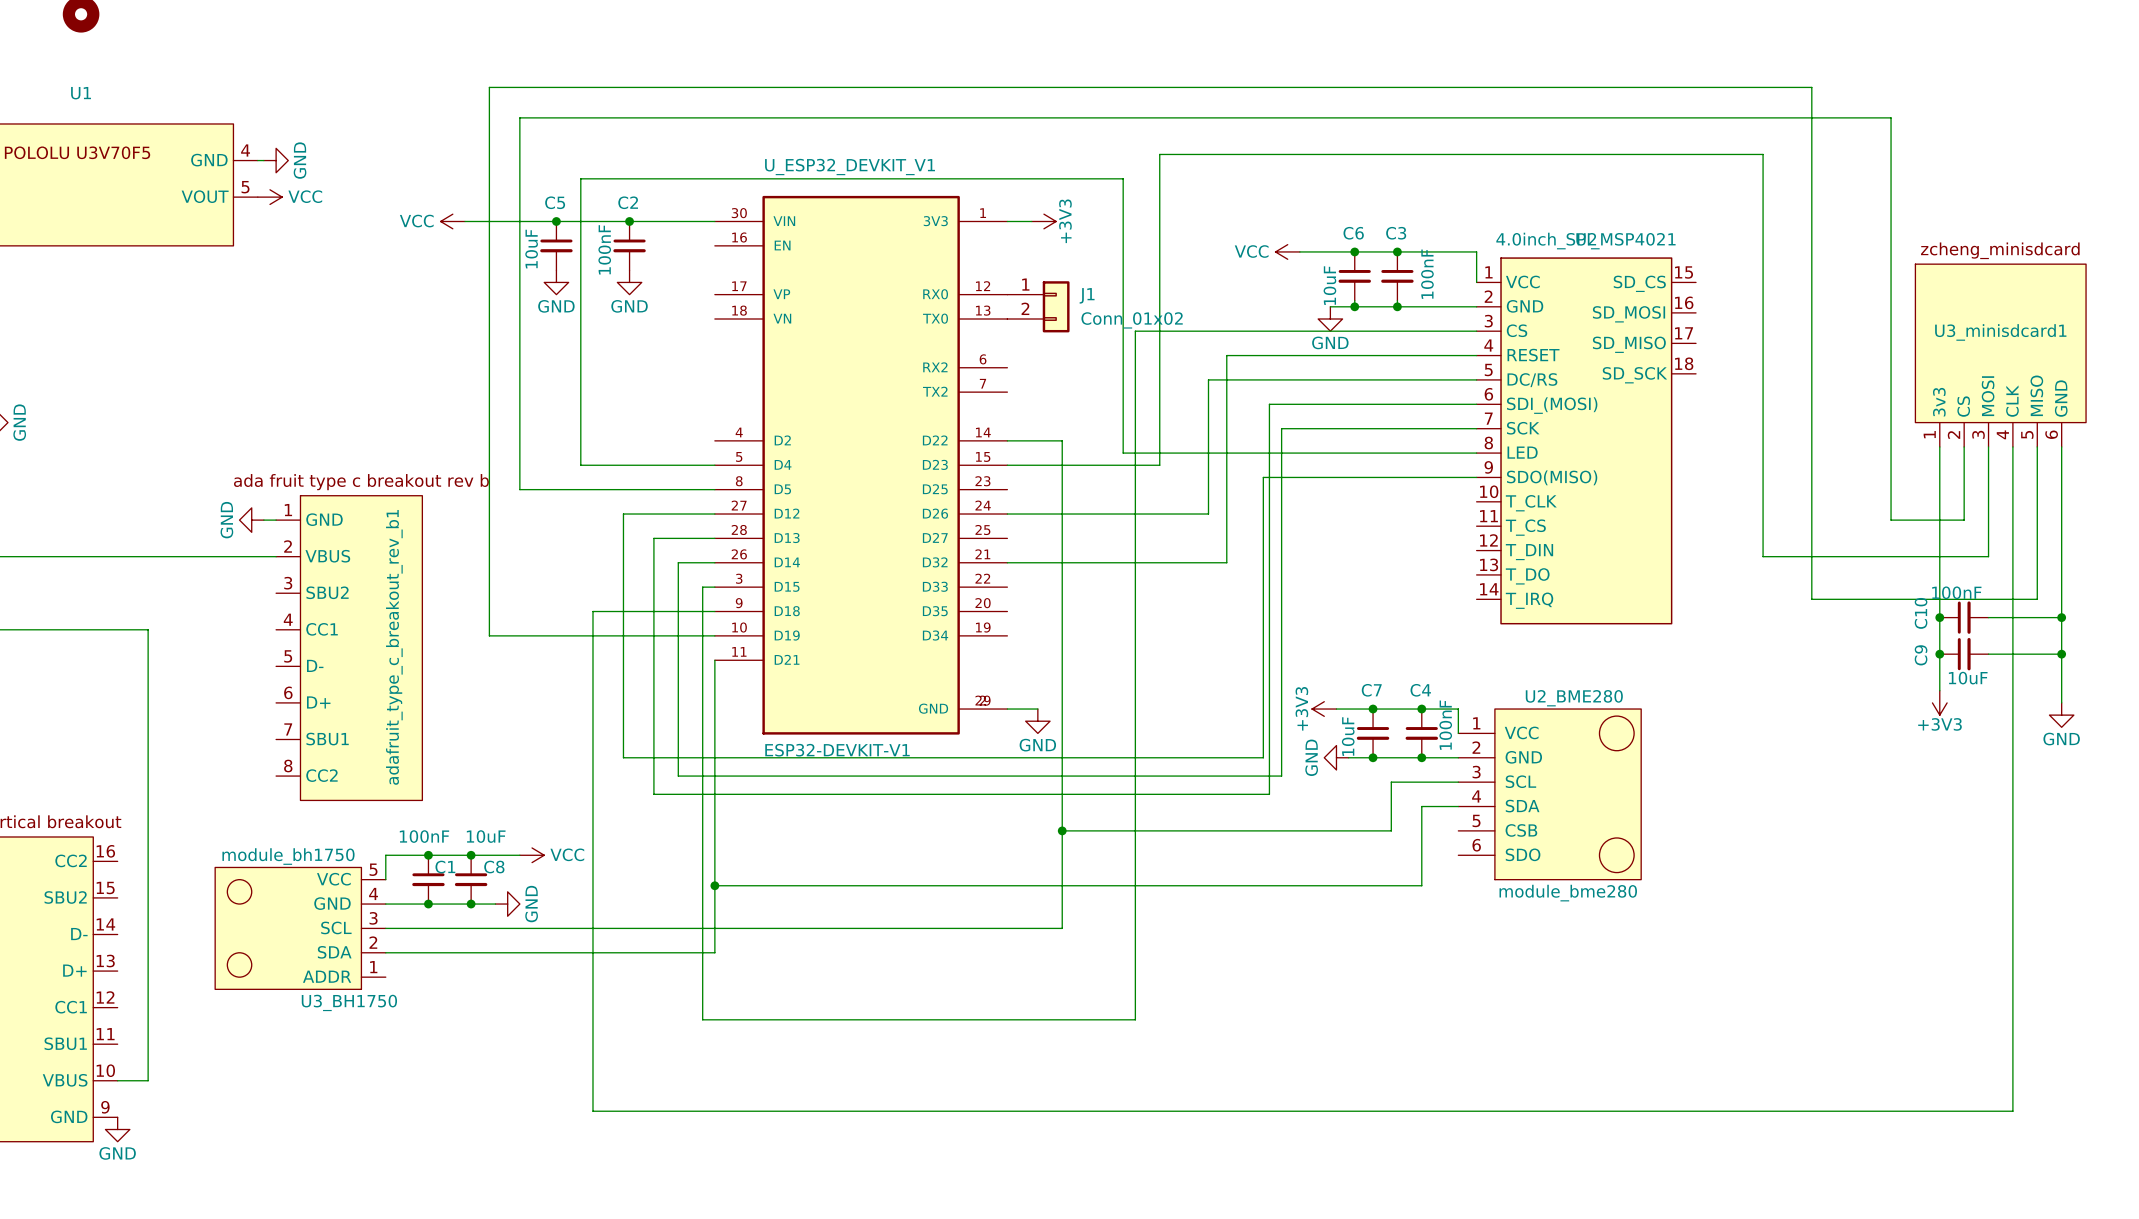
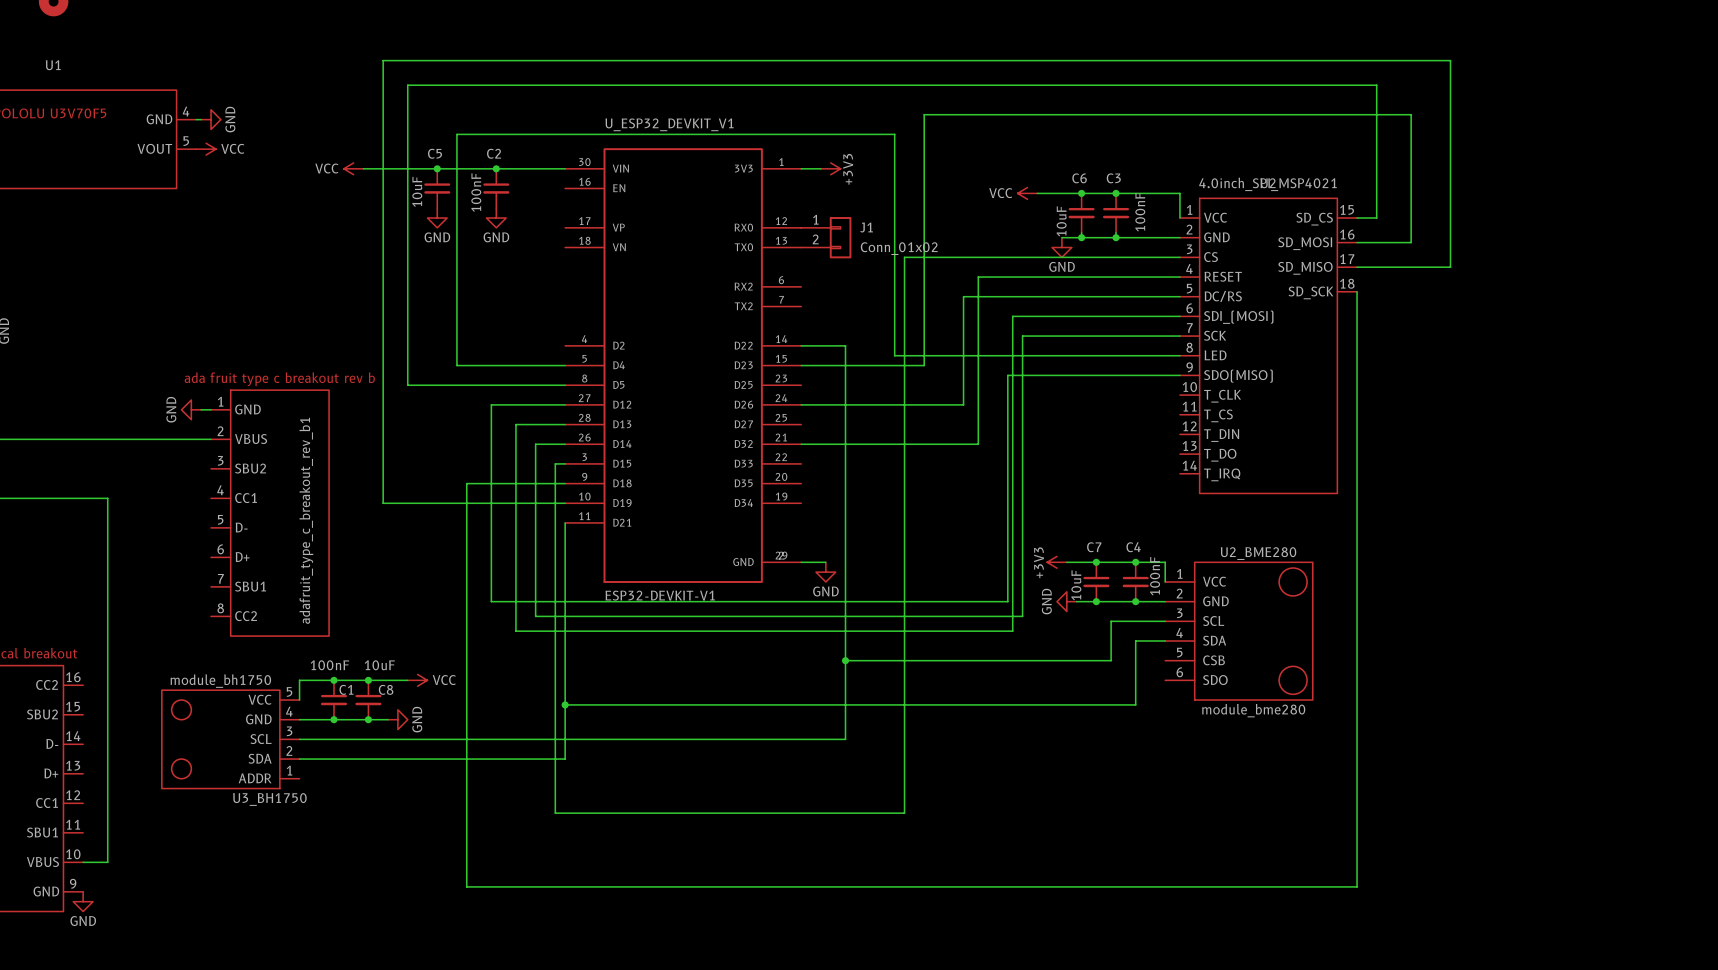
wire: (1720, 117) (1891, 117) (1891, 520) (1964, 520) (1964, 446) -> (1376, 85) (1376, 218) (1357, 218)
wire: (1763, 312) (1763, 556) (1988, 556) (1988, 446) -> (1411, 242) (1357, 242)
wire: (1811, 343) (1811, 599) (2037, 599) (2037, 446) -> (1450, 267) (1357, 267)
U3_minisdcard1: (2000, 355) -> none
wire: (1939, 446) (1939, 690) -> none
wire: (2012, 446) (2012, 1111) (1696, 1111) -> (1357, 291) (1357, 886)
wire: (2061, 446) (2061, 702) -> none
junction: (1939, 617) -> none
C10: 100nF (1964, 617) -> none
wire: (1988, 617) (2061, 617) -> none
junction: (2061, 617) -> none
junction: (1939, 654) -> none
C9: 10uF (1964, 654) -> none
wire: (1988, 654) (2061, 654) -> none
junction: (2061, 654) -> none
power symbol: +3V3 (1939, 702) -> none
power symbol: GND (2061, 715) -> none

